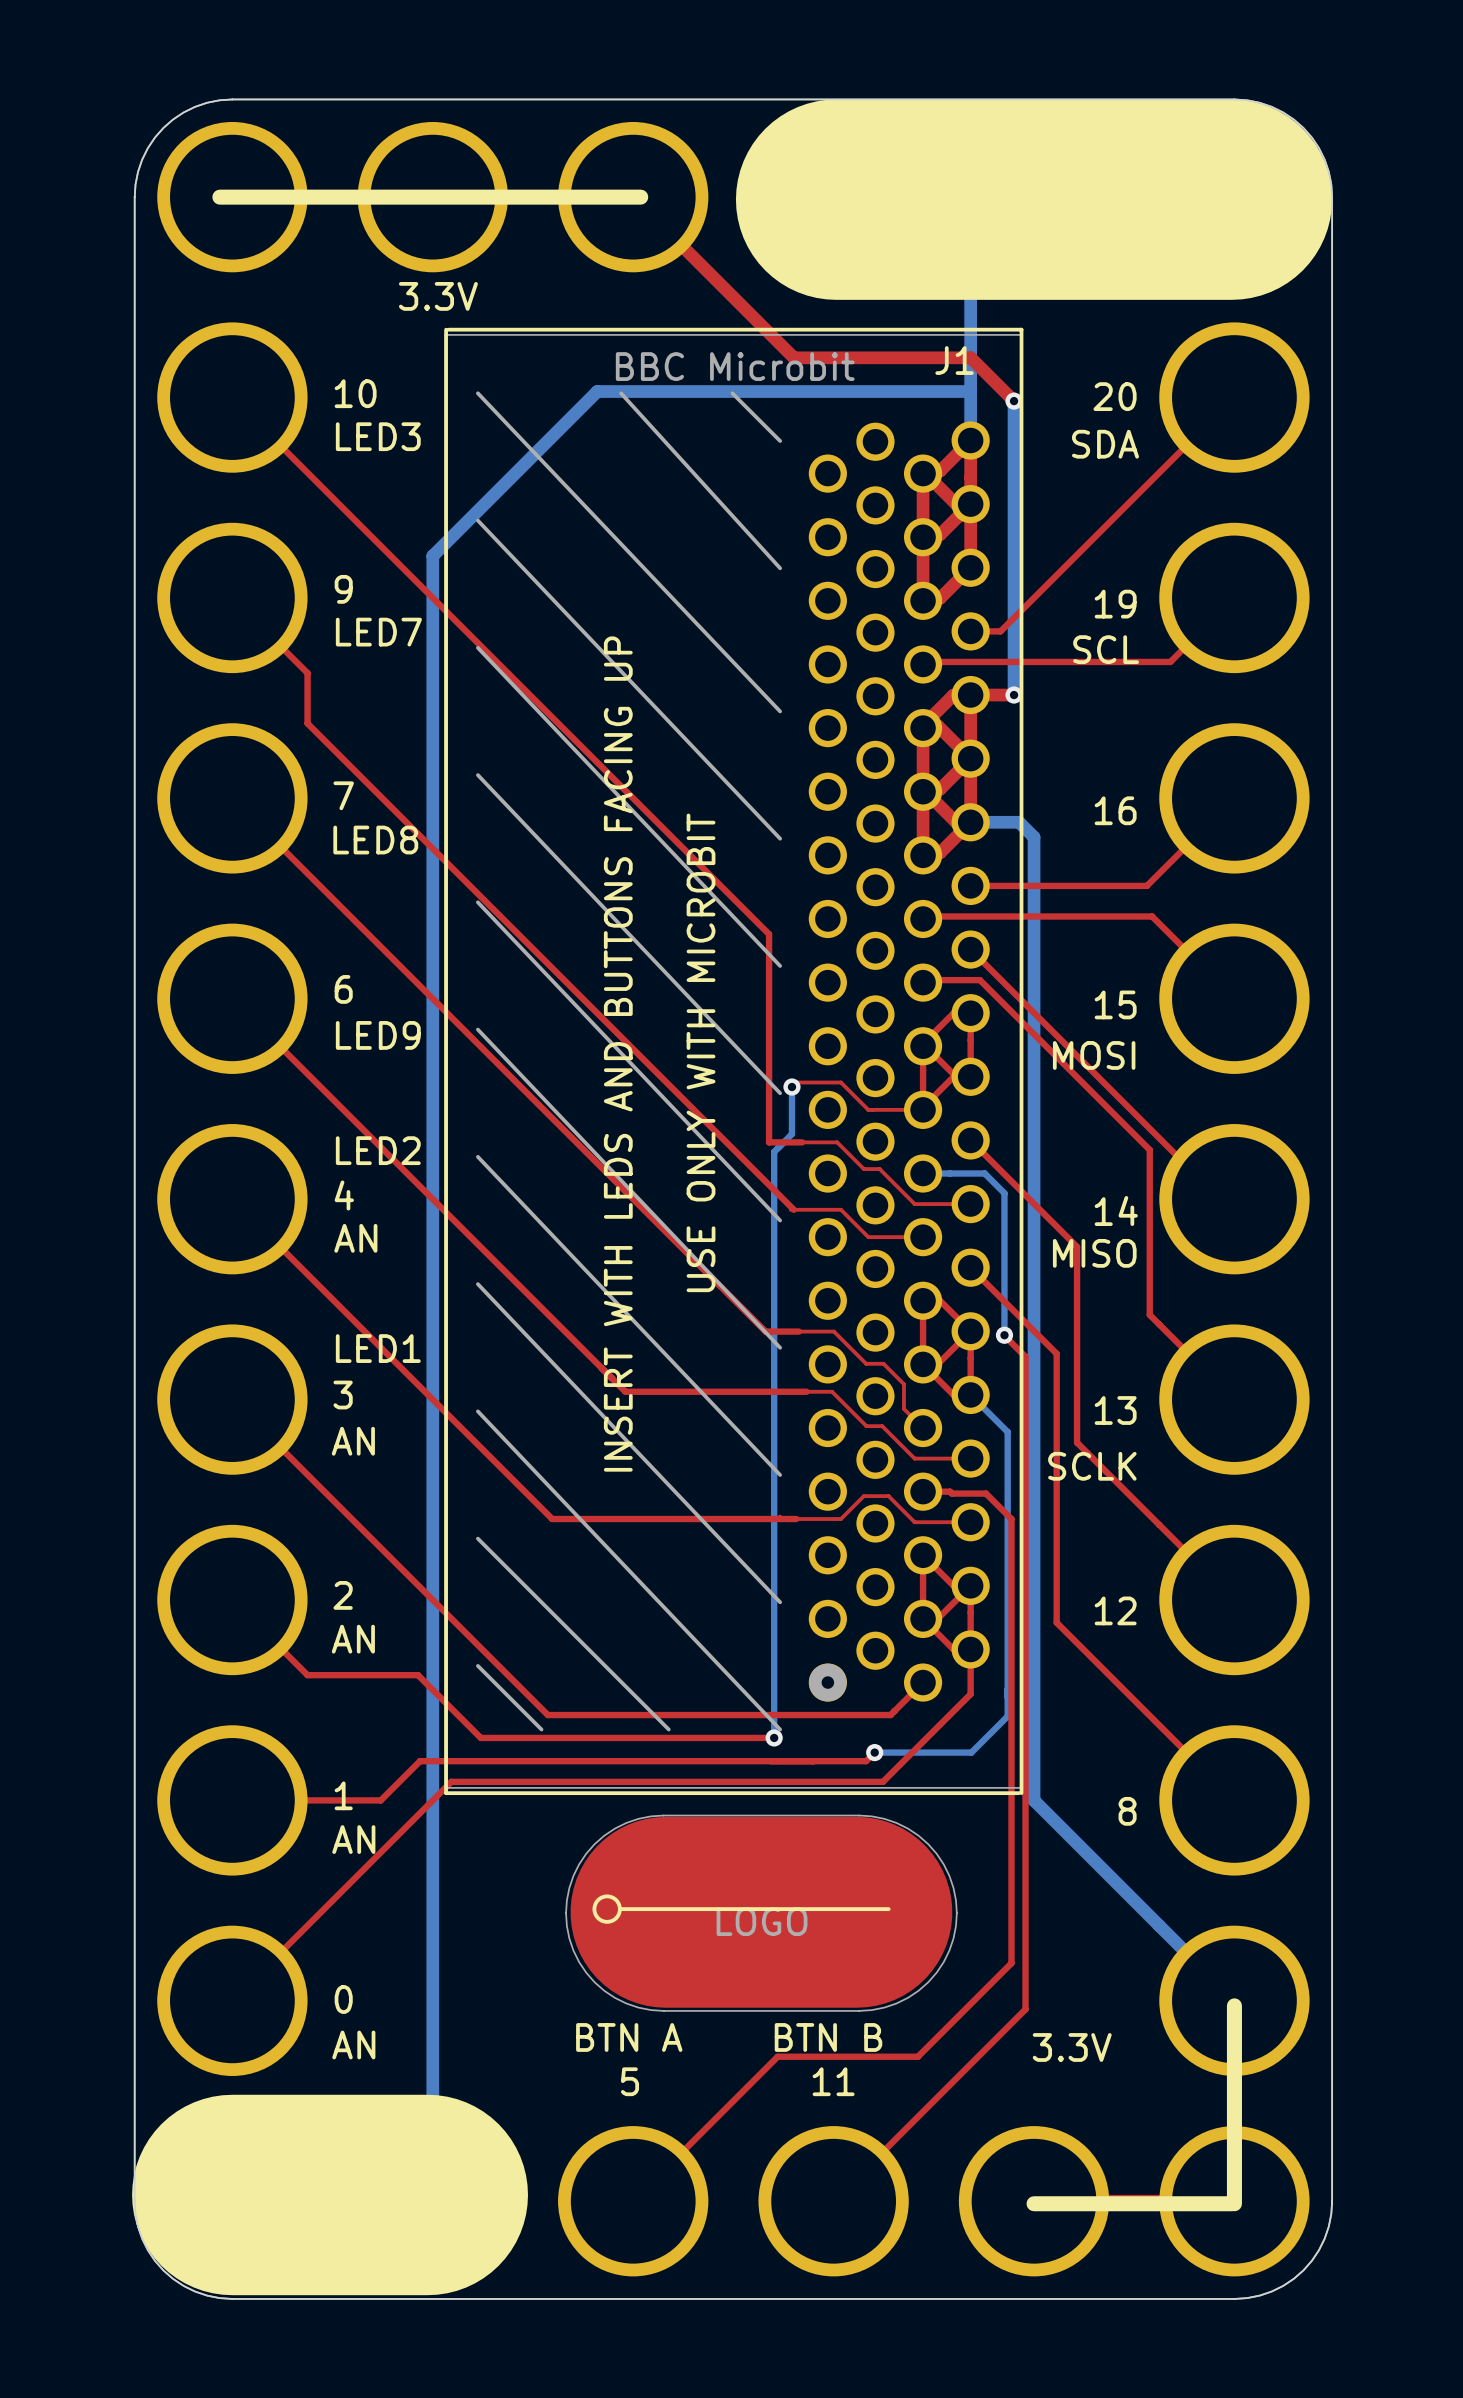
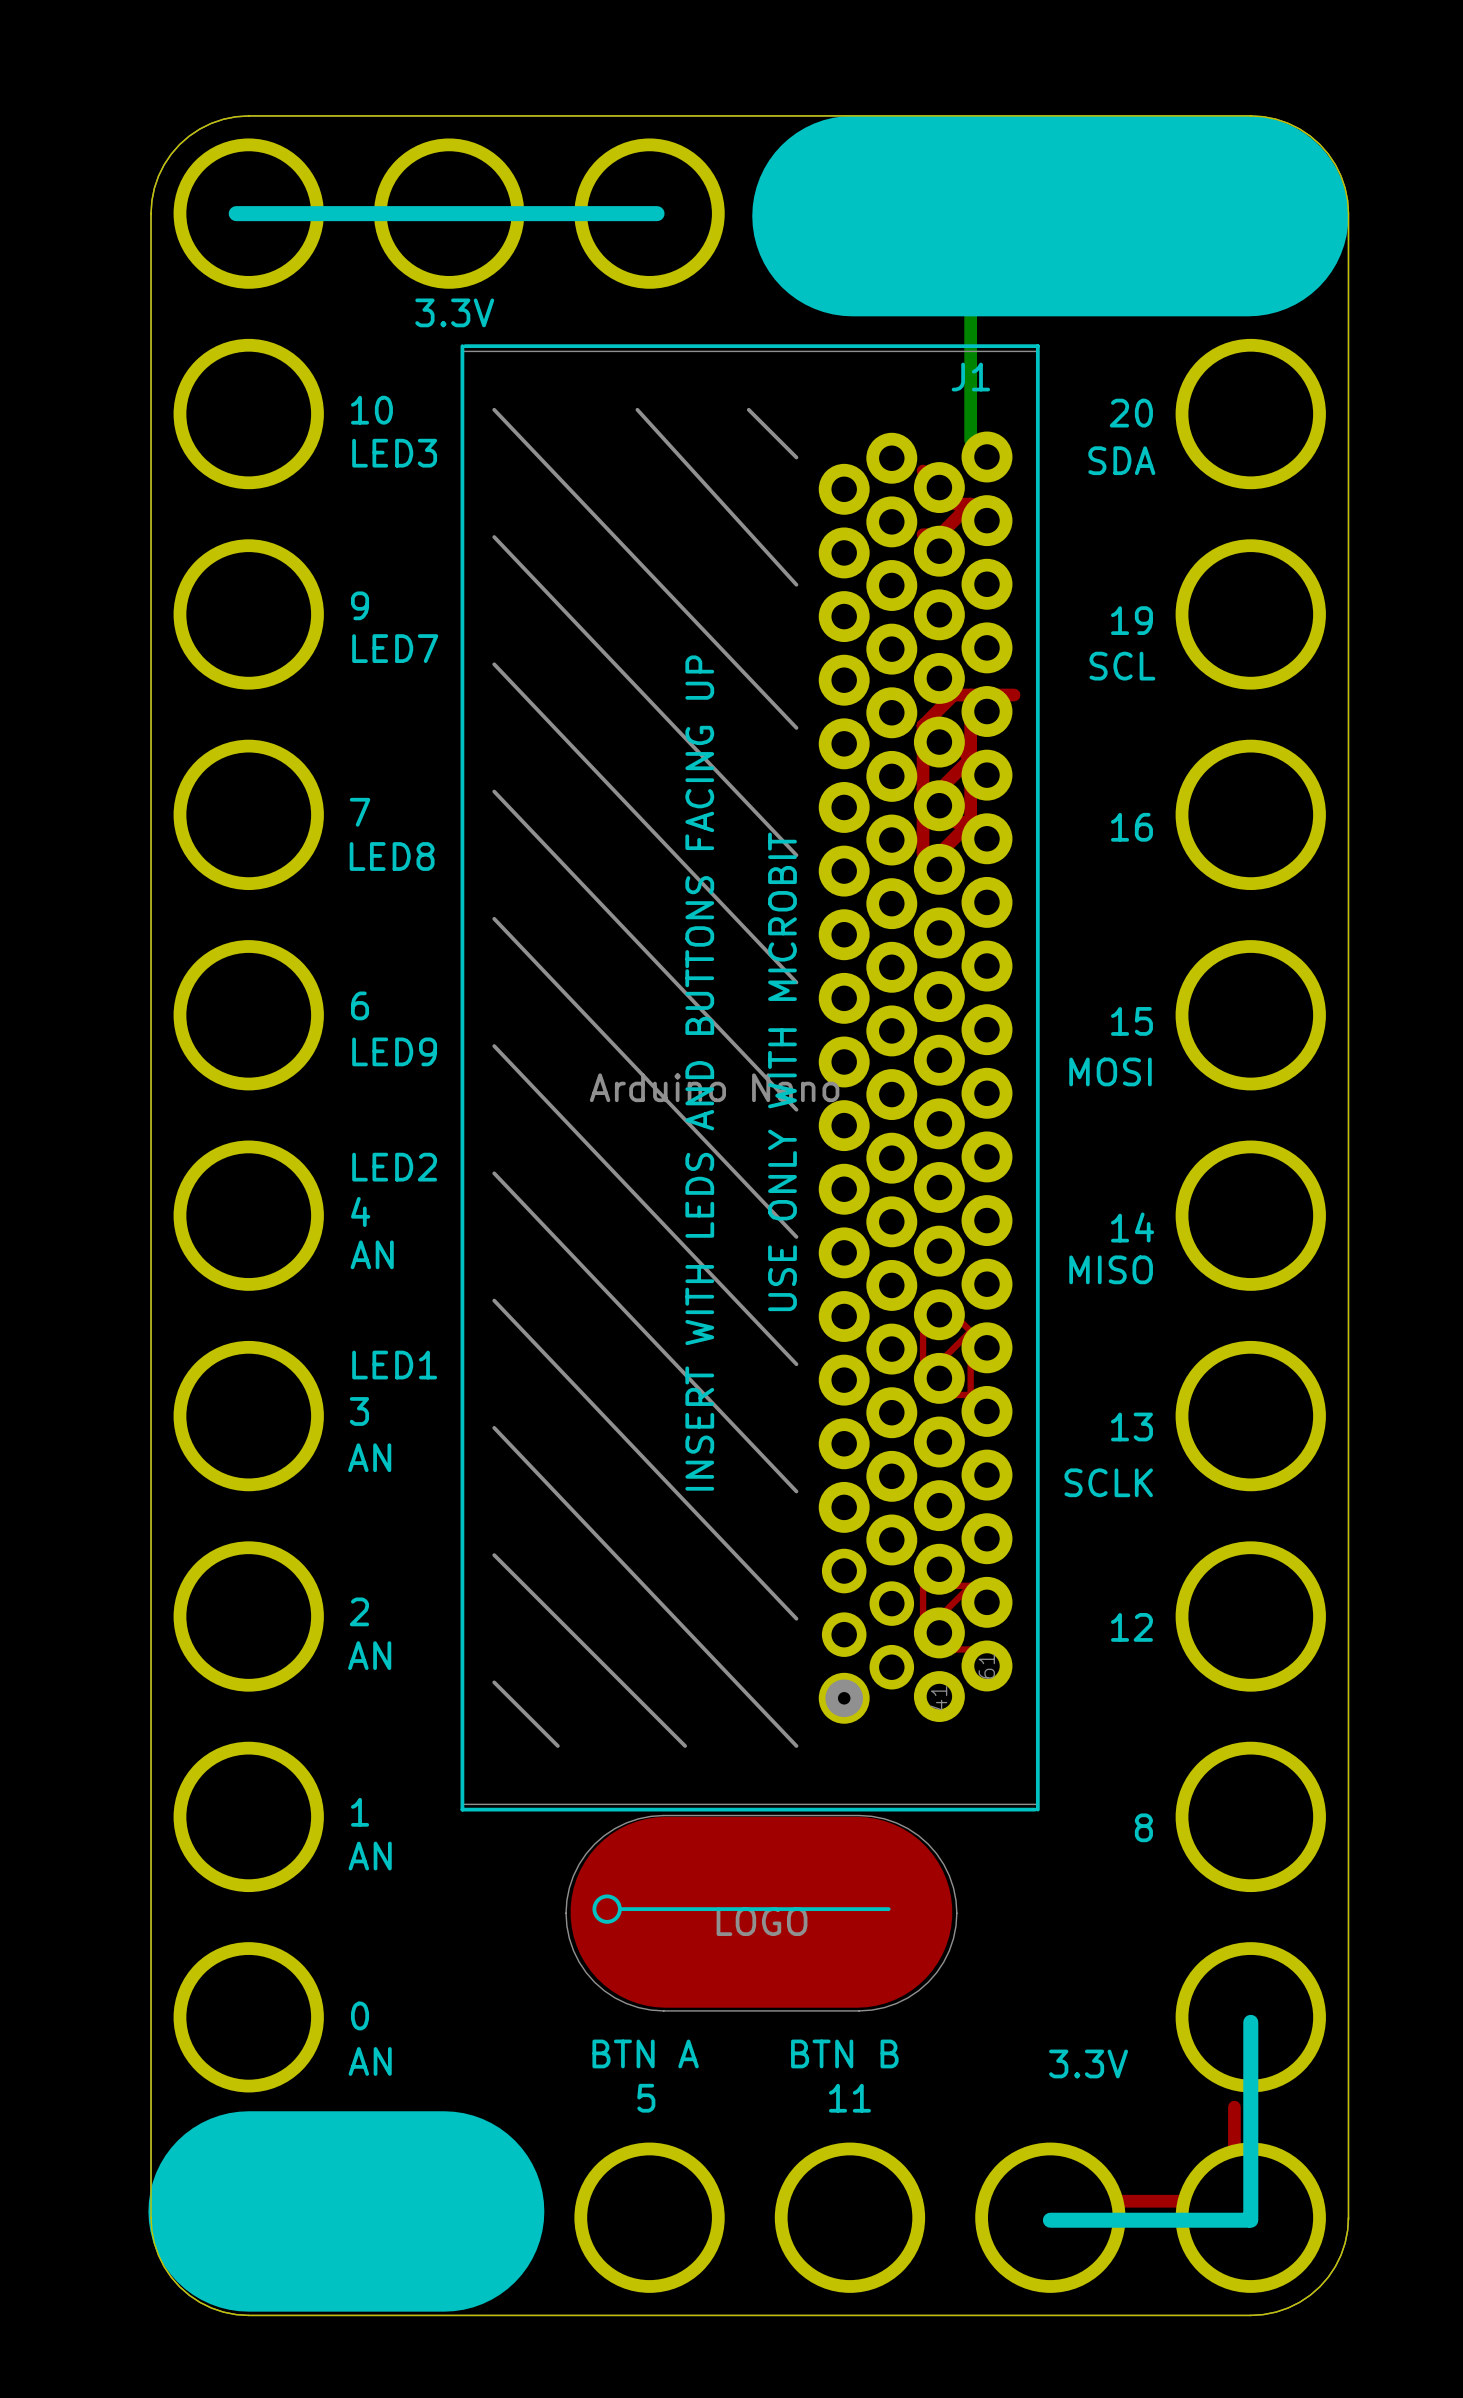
J1 footprint: [132, 98, 1333, 2300] -> [148, 115, 1349, 2316]
top track: (232, 197) (633, 197) (793, 357) (970, 357) (1014, 401) -> none
bottom track: (970, 391) (597, 391) (432, 556) (432, 2201) (232, 2201) -> none
top track: (232, 397) (769, 934) (769, 1142) (802, 1142) -> none
top track: (1234, 397) (1000, 631) (970, 631) -> none
bottom track: (1014, 401) (1014, 695) -> none
via: (1014, 401) -> none
top track: (970, 440) (970, 567) (940, 598) (923, 598) (923, 471) (940, 471) (970, 440) -> none
top track: (232, 597) (307, 673) (307, 723) (793, 1209) -> none
top track: (1234, 597) (1170, 661) (923, 661) -> none
via: (1014, 695) -> none
top track: (232, 798) (765, 1331) (798, 1331) -> none
top track: (1234, 798) (1146, 885) (970, 885) -> none
bottom track: (970, 822) (1019, 822) (1034, 837) (1034, 1800) (1234, 2000) -> none
top track: (923, 916) (1152, 916) (1234, 998) -> none
top track: (970, 949) (1220, 1199) (1234, 1199) -> none
top track: (923, 980) (979, 980) (1149, 1149) (1149, 1314) (1234, 1399) -> none
top track: (232, 998) (625, 1391) (806, 1391) -> none
top track: (923, 1043) (923, 1107) (953, 1076) (970, 1076) (970, 1013) (953, 1013) (923, 1043) -> none
top track: (923, 1043) (956, 1076) -> none
top track: (791, 1087) (796, 1082) (841, 1082) (868, 1109) (923, 1109) -> none
bottom track: (791, 1087) (791, 1134) (774, 1151) (774, 1737) -> none
via: (791, 1087) -> none
top track: (970, 1140) (1077, 1246) (1077, 1442) (1234, 1600) -> none
top track: (795, 1142) (837, 1142) (863, 1169) (879, 1169) (914, 1204) (970, 1204) -> none
bottom track: (923, 1173) (984, 1173) (1004, 1193) (1004, 1335) -> none
top track: (232, 1199) (552, 1519) (796, 1519) -> none
top track: (790, 1209) (841, 1209) (868, 1237) (923, 1237) -> none
top track: (970, 1267) (1056, 1353) (1056, 1622) (1234, 1800) -> none
top track: (792, 1331) (833, 1331) (866, 1363) (883, 1363) (903, 1384) (903, 1408) (923, 1428) -> none
top track: (1004, 1335) (1025, 1356) (1025, 2009) (833, 2201) -> none
via: (1004, 1335) -> none
top track: (800, 1391) (832, 1391) (866, 1426) (882, 1426) (914, 1458) (970, 1458) -> none
bottom track: (970, 1394) (1007, 1431) (1007, 1716) (971, 1752) (874, 1752) -> none
top track: (232, 1399) (547, 1715) (890, 1715) (923, 1682) -> none
top track: (923, 1491) (986, 1493) (1011, 1519) (1011, 1963) (917, 2056) (777, 2056) (633, 2201) -> none
top track: (779, 1516) (782, 1519) (841, 1519) (863, 1496) (888, 1496) (914, 1522) (970, 1522) -> none
top track: (970, 1585) (970, 1694) (882, 1781) (451, 1781) (232, 2000) -> none
top track: (232, 1600) (307, 1675) (418, 1675) (480, 1737) (774, 1737) -> none
via: (774, 1737) -> none
top track: (874, 1752) (866, 1761) (420, 1761) (380, 1800) (232, 1800) -> none
via: (874, 1752) -> none

